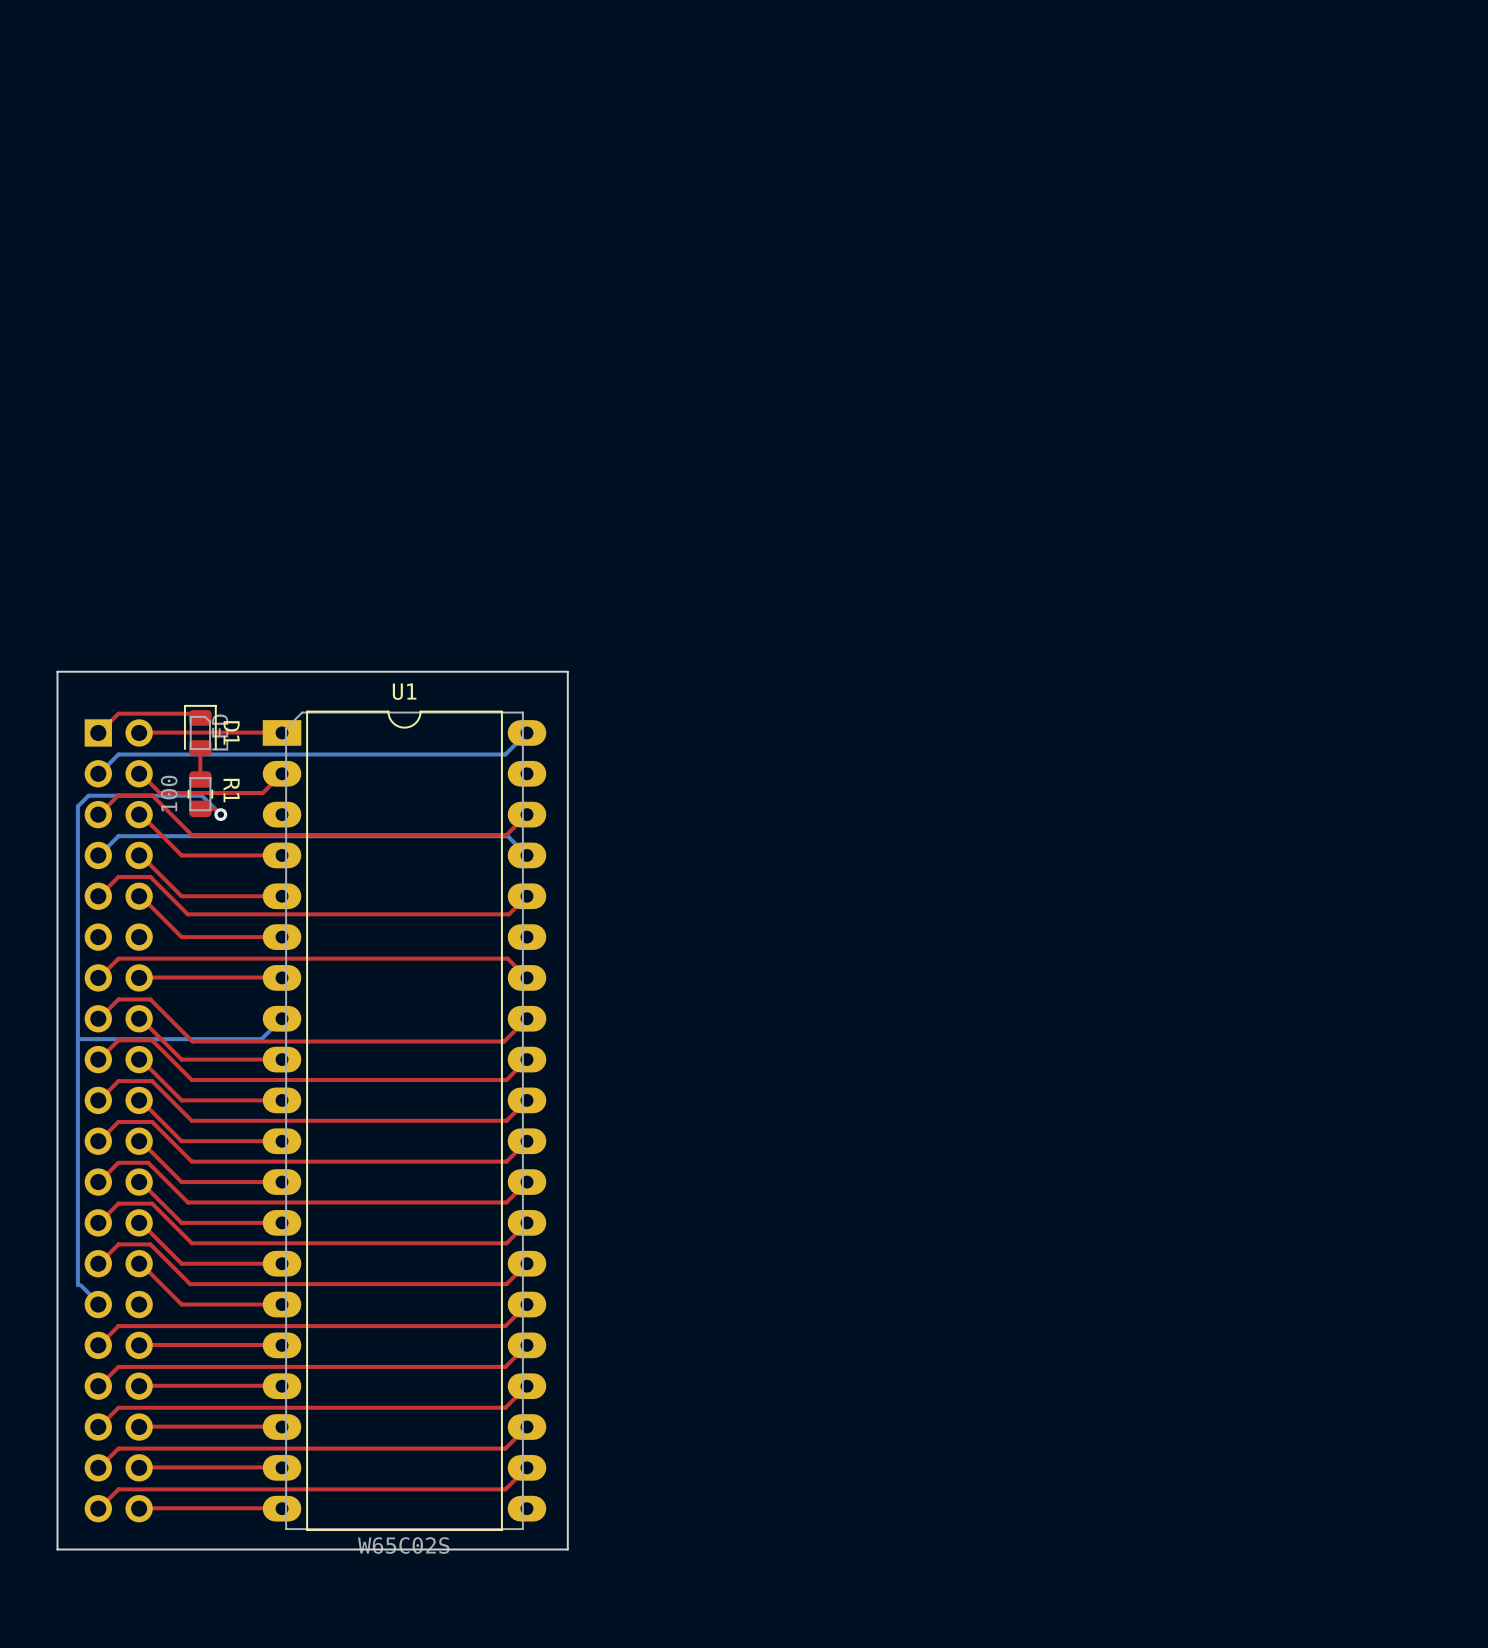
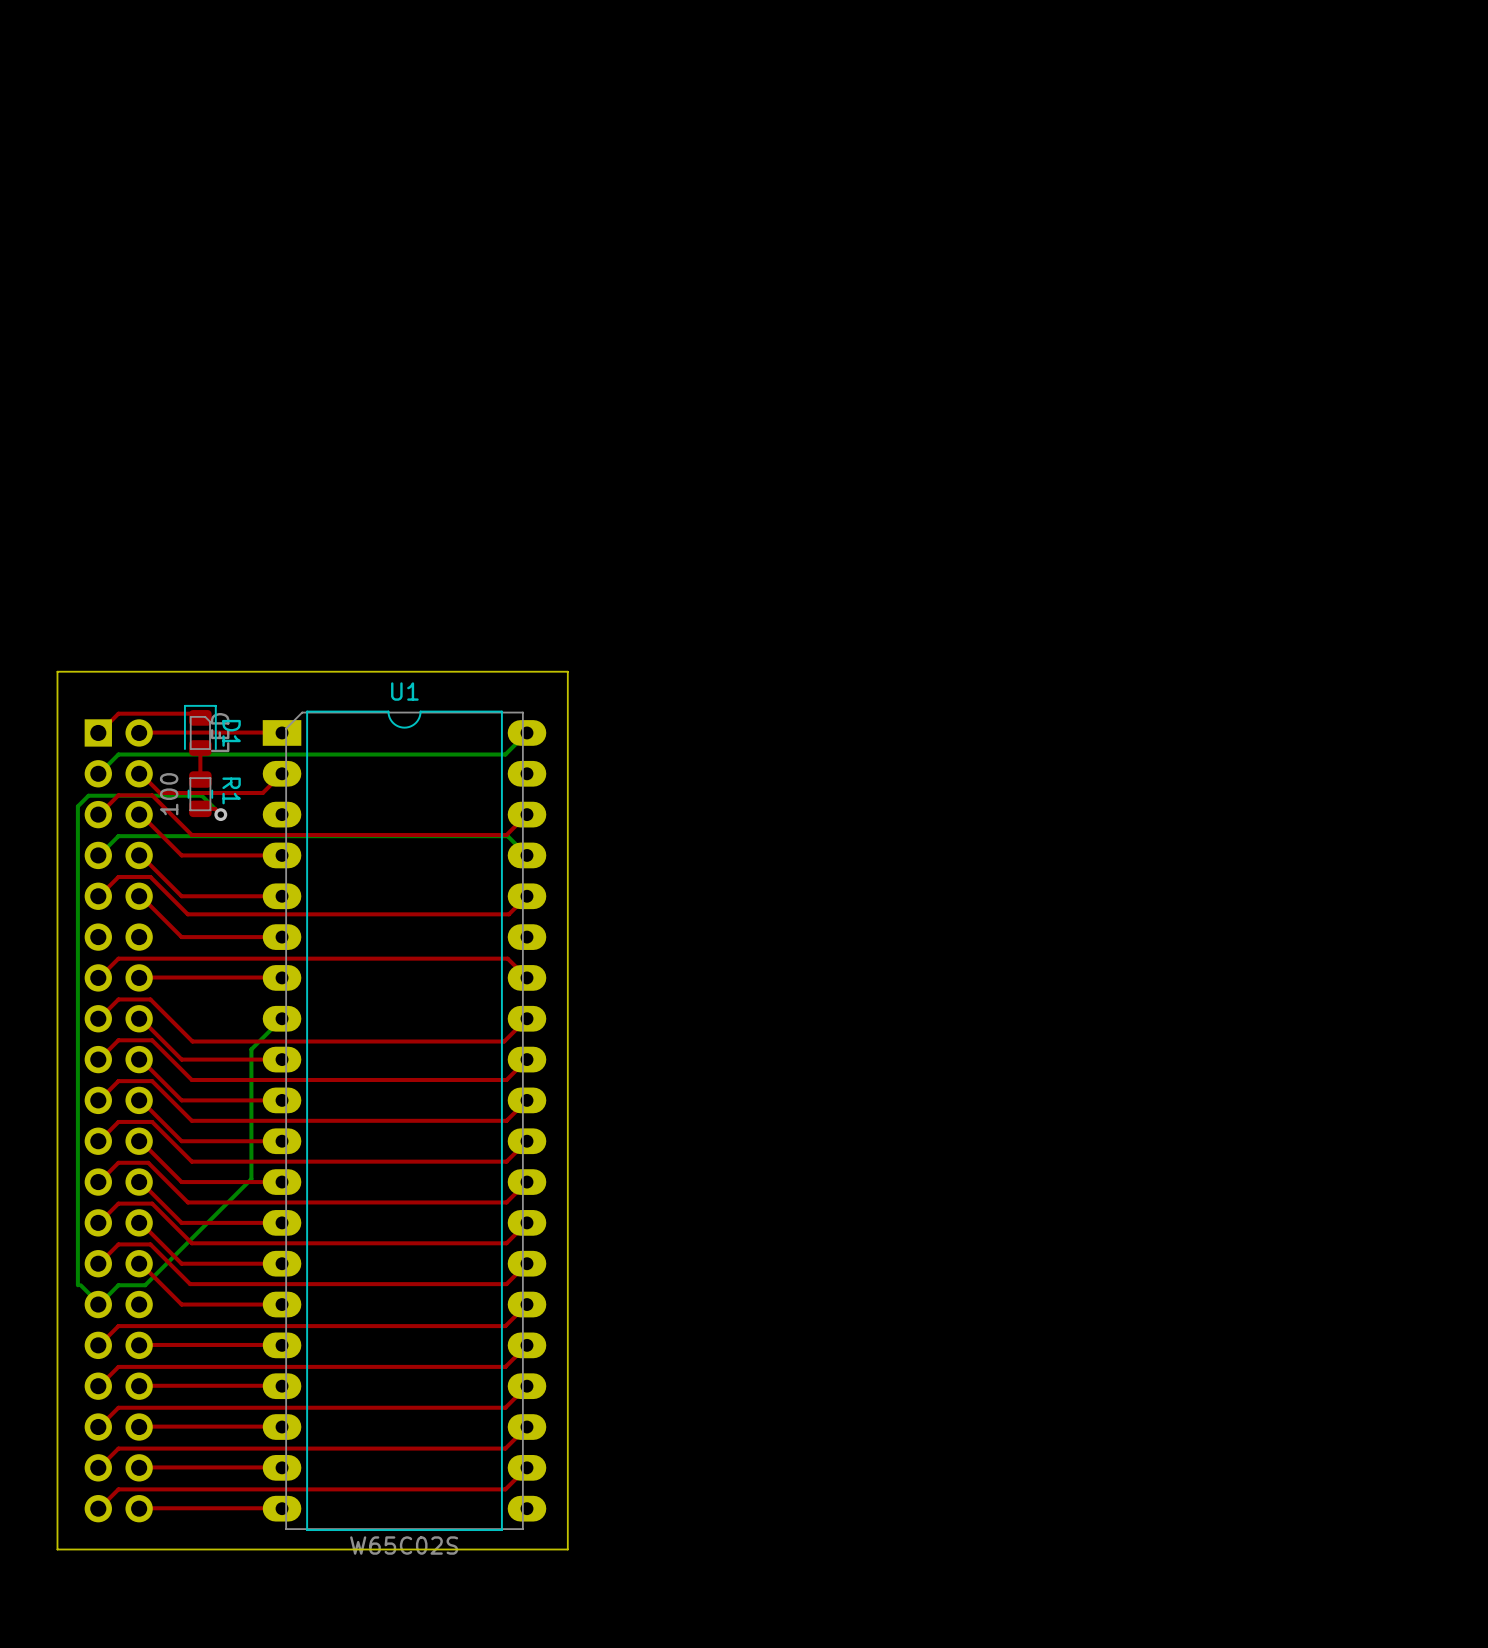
bottom track: (77, 1039) (261, 1039) -> (99, 1304) (118, 1285) (145, 1285) (251, 1179) (251, 1049) (261, 1039)

